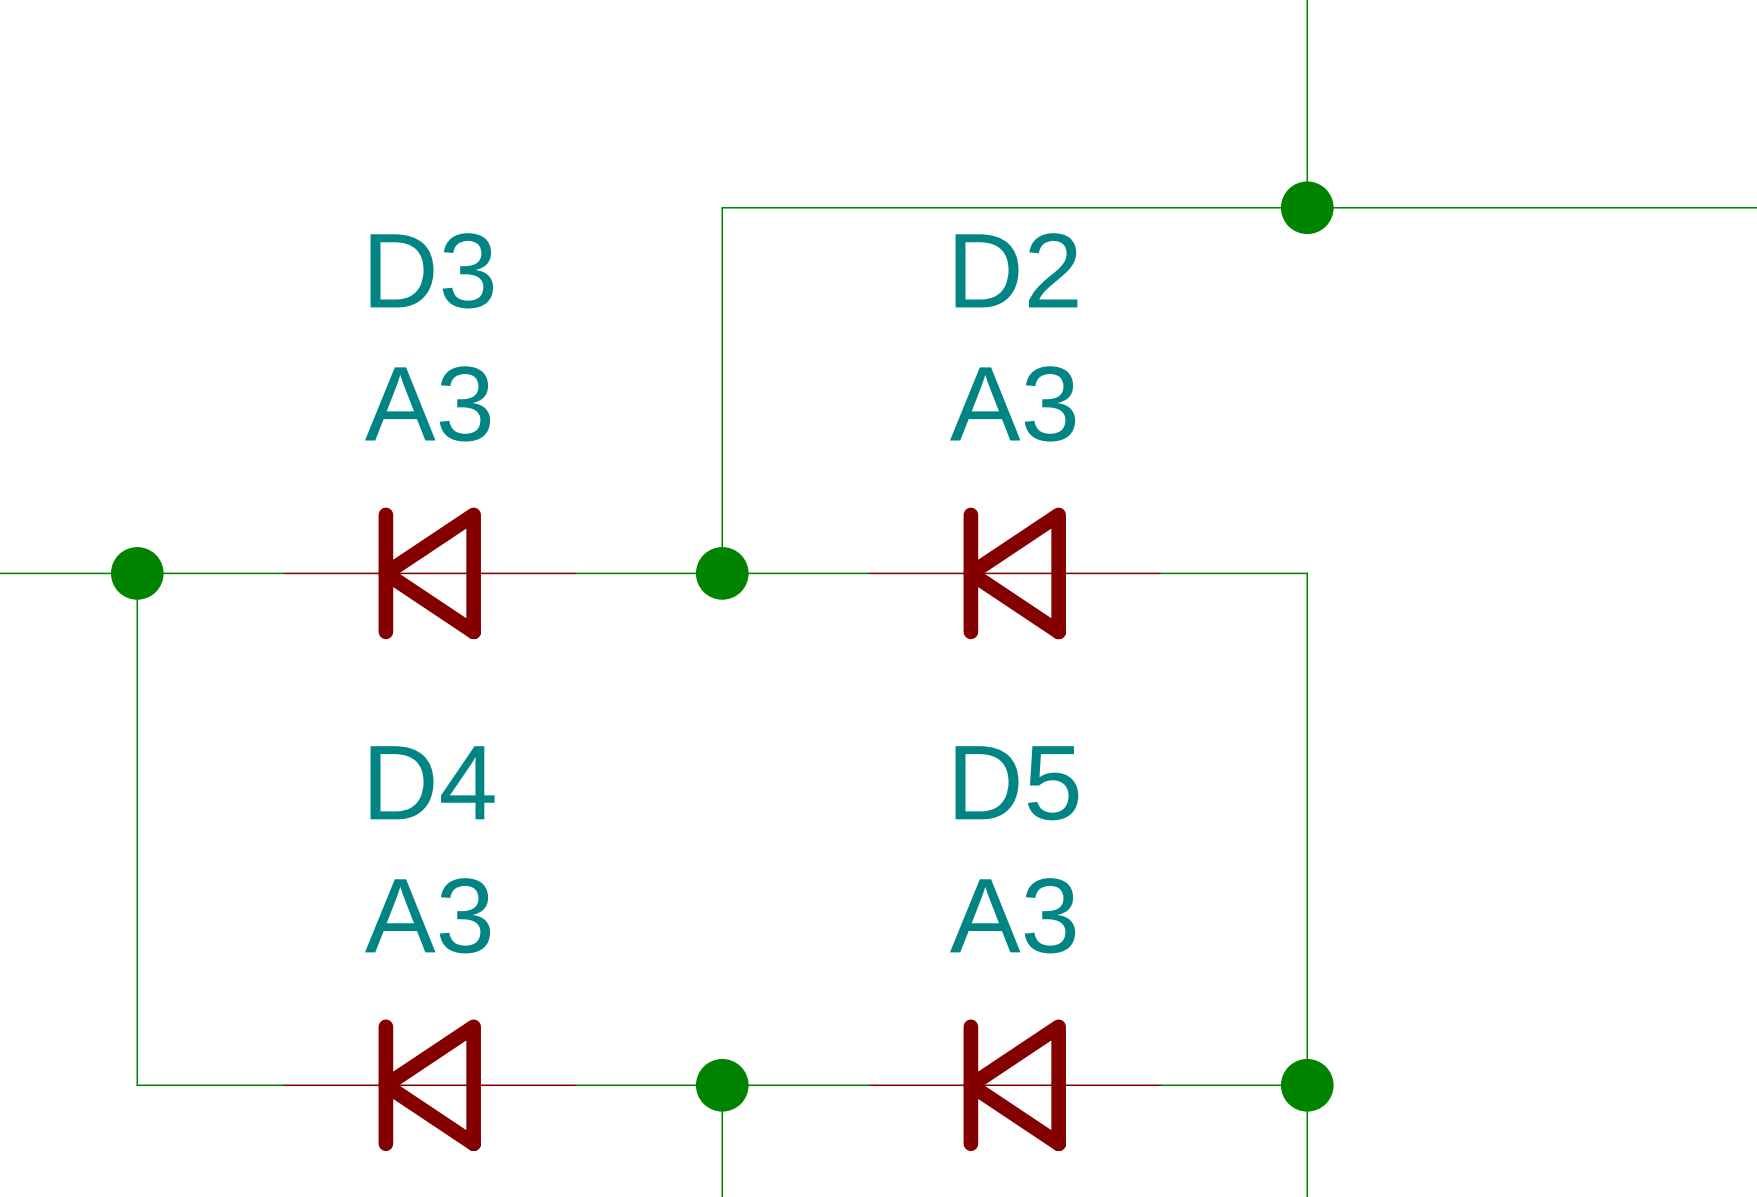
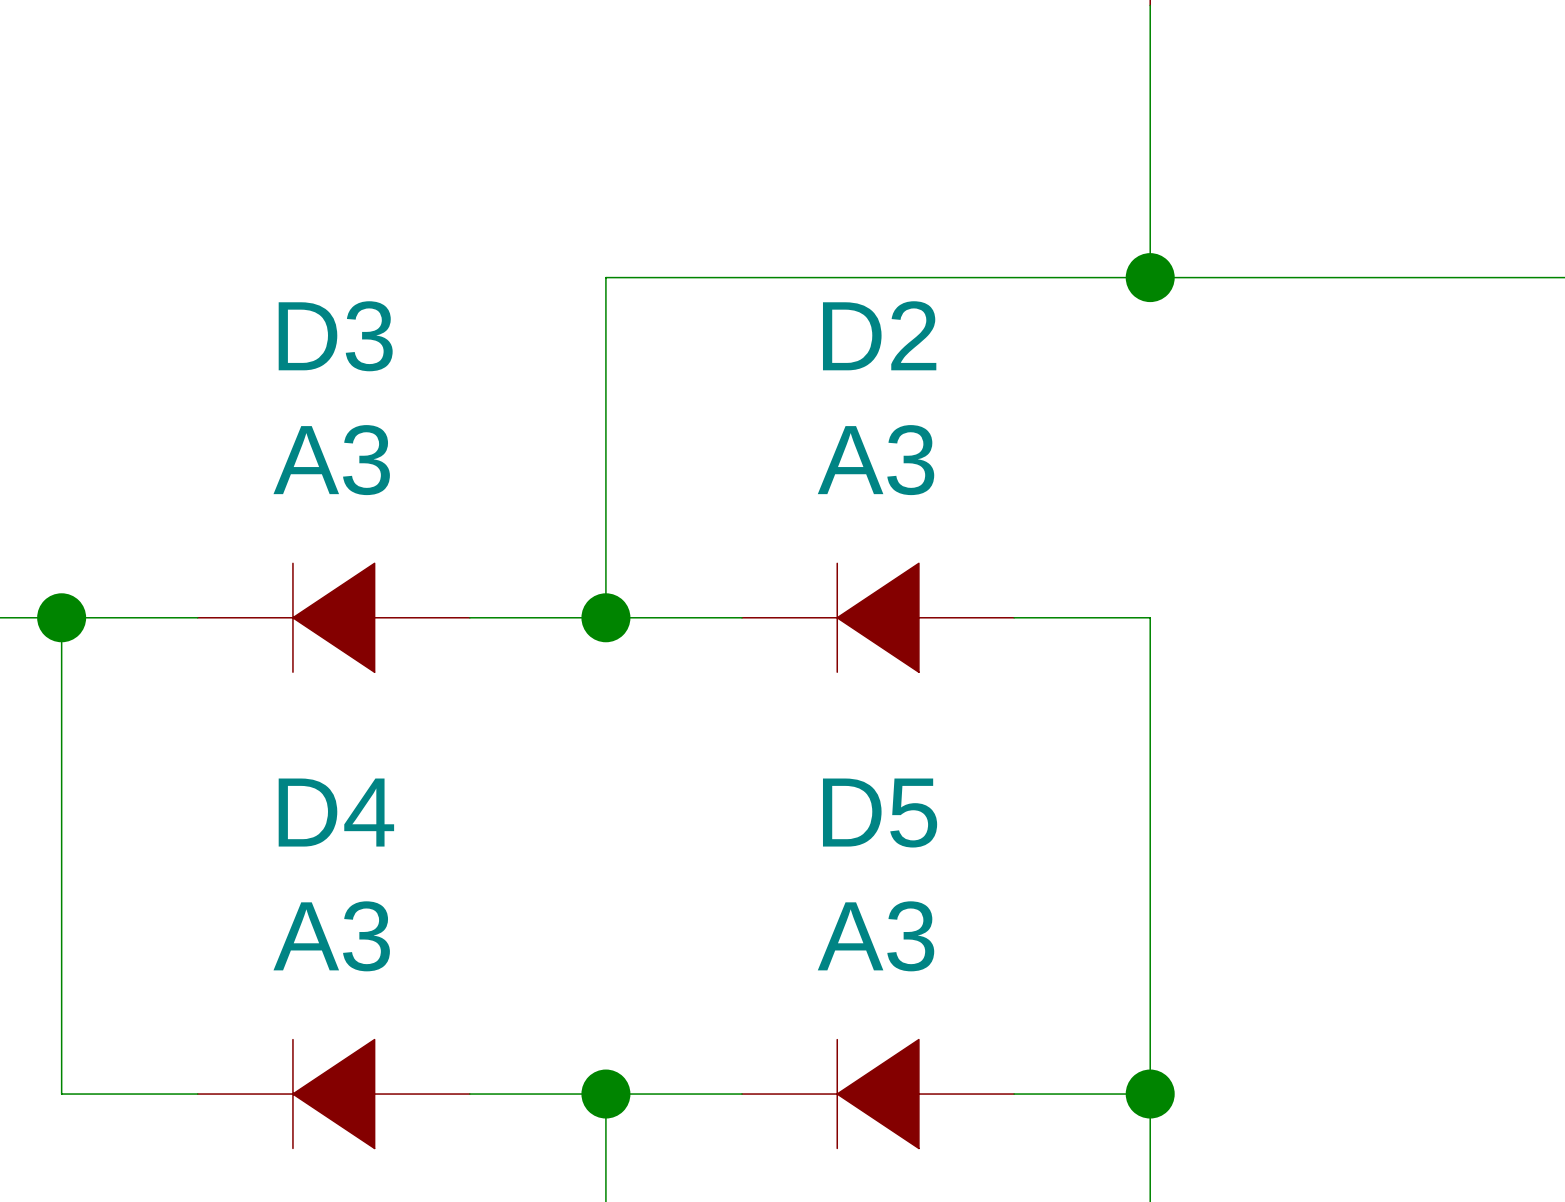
D3 symbol: [283, 507, 577, 640] -> [197, 563, 470, 673]
D2 symbol: [868, 507, 1162, 640] -> [742, 563, 1015, 673]
D4 symbol: [283, 1019, 577, 1152] -> [197, 1039, 470, 1149]
D5 symbol: [868, 1019, 1162, 1152] -> [742, 1039, 1015, 1149]

